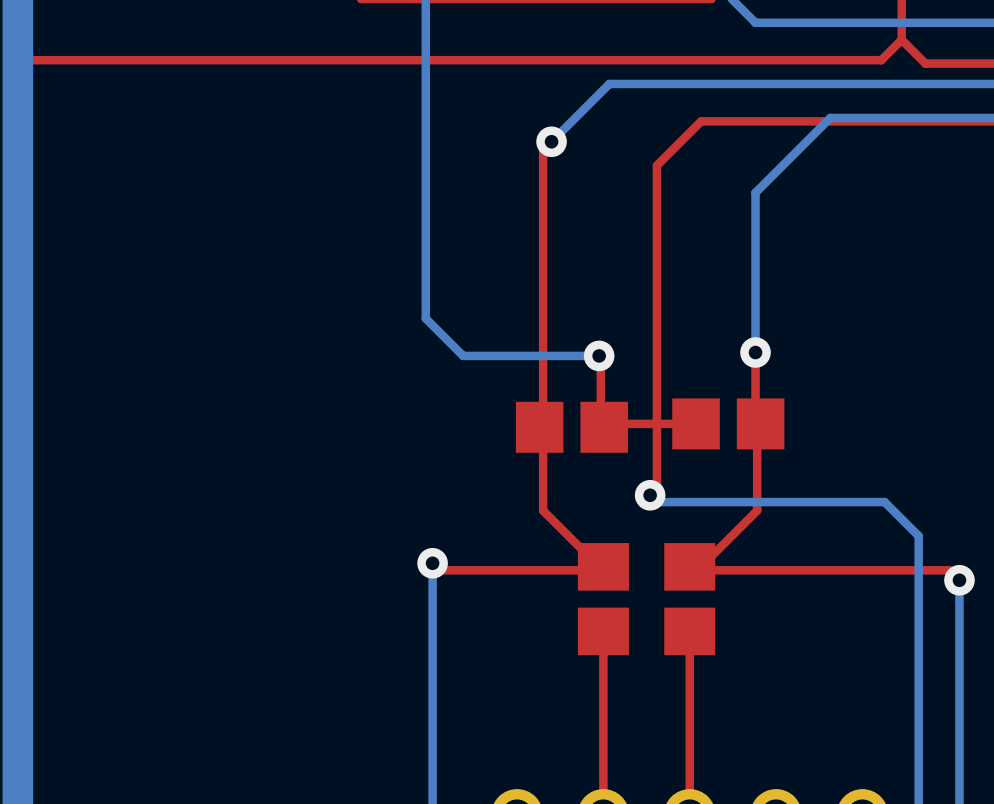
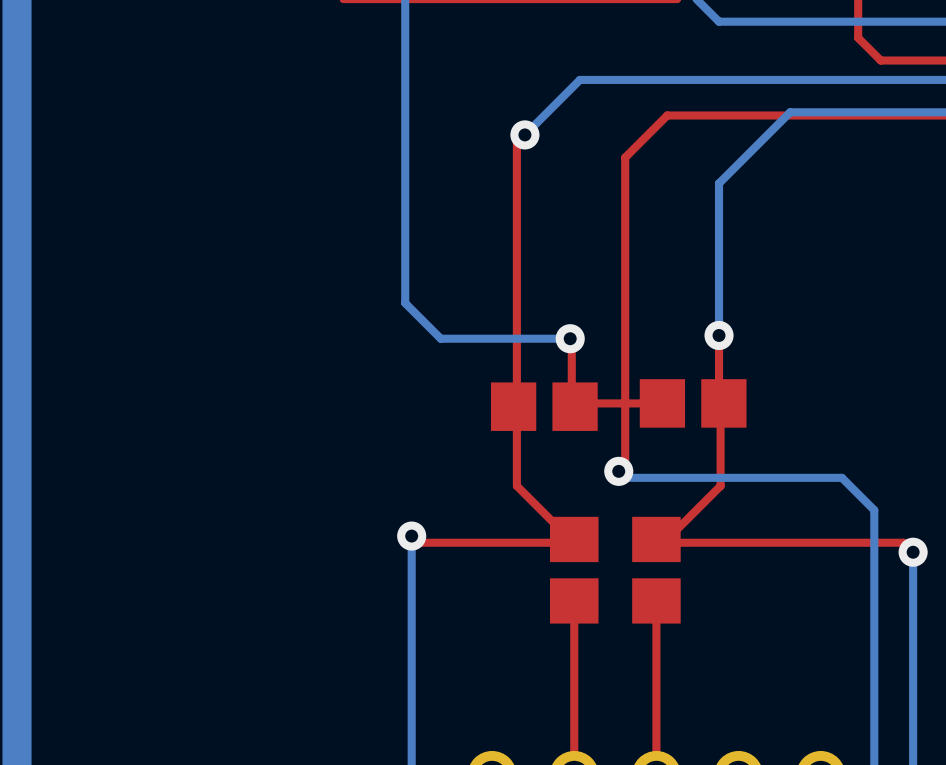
top track: (901, 39) (881, 60) (17, 60) -> none

